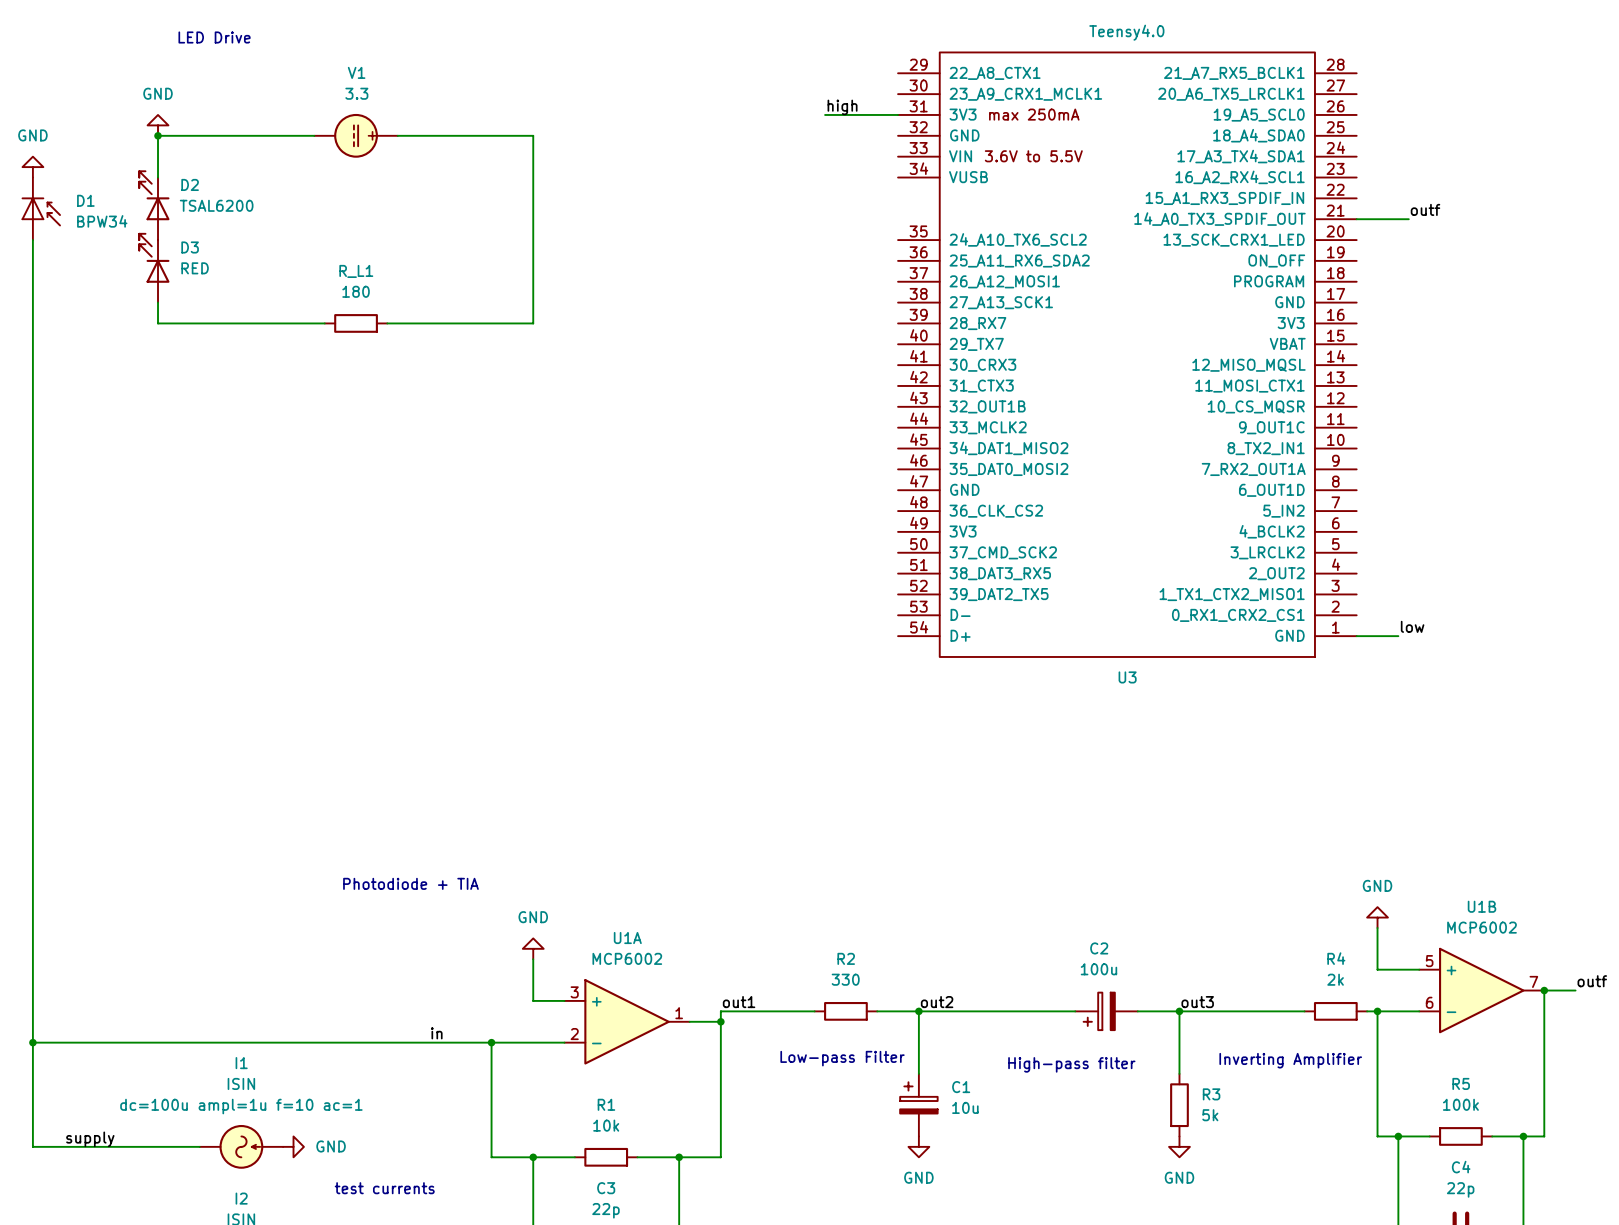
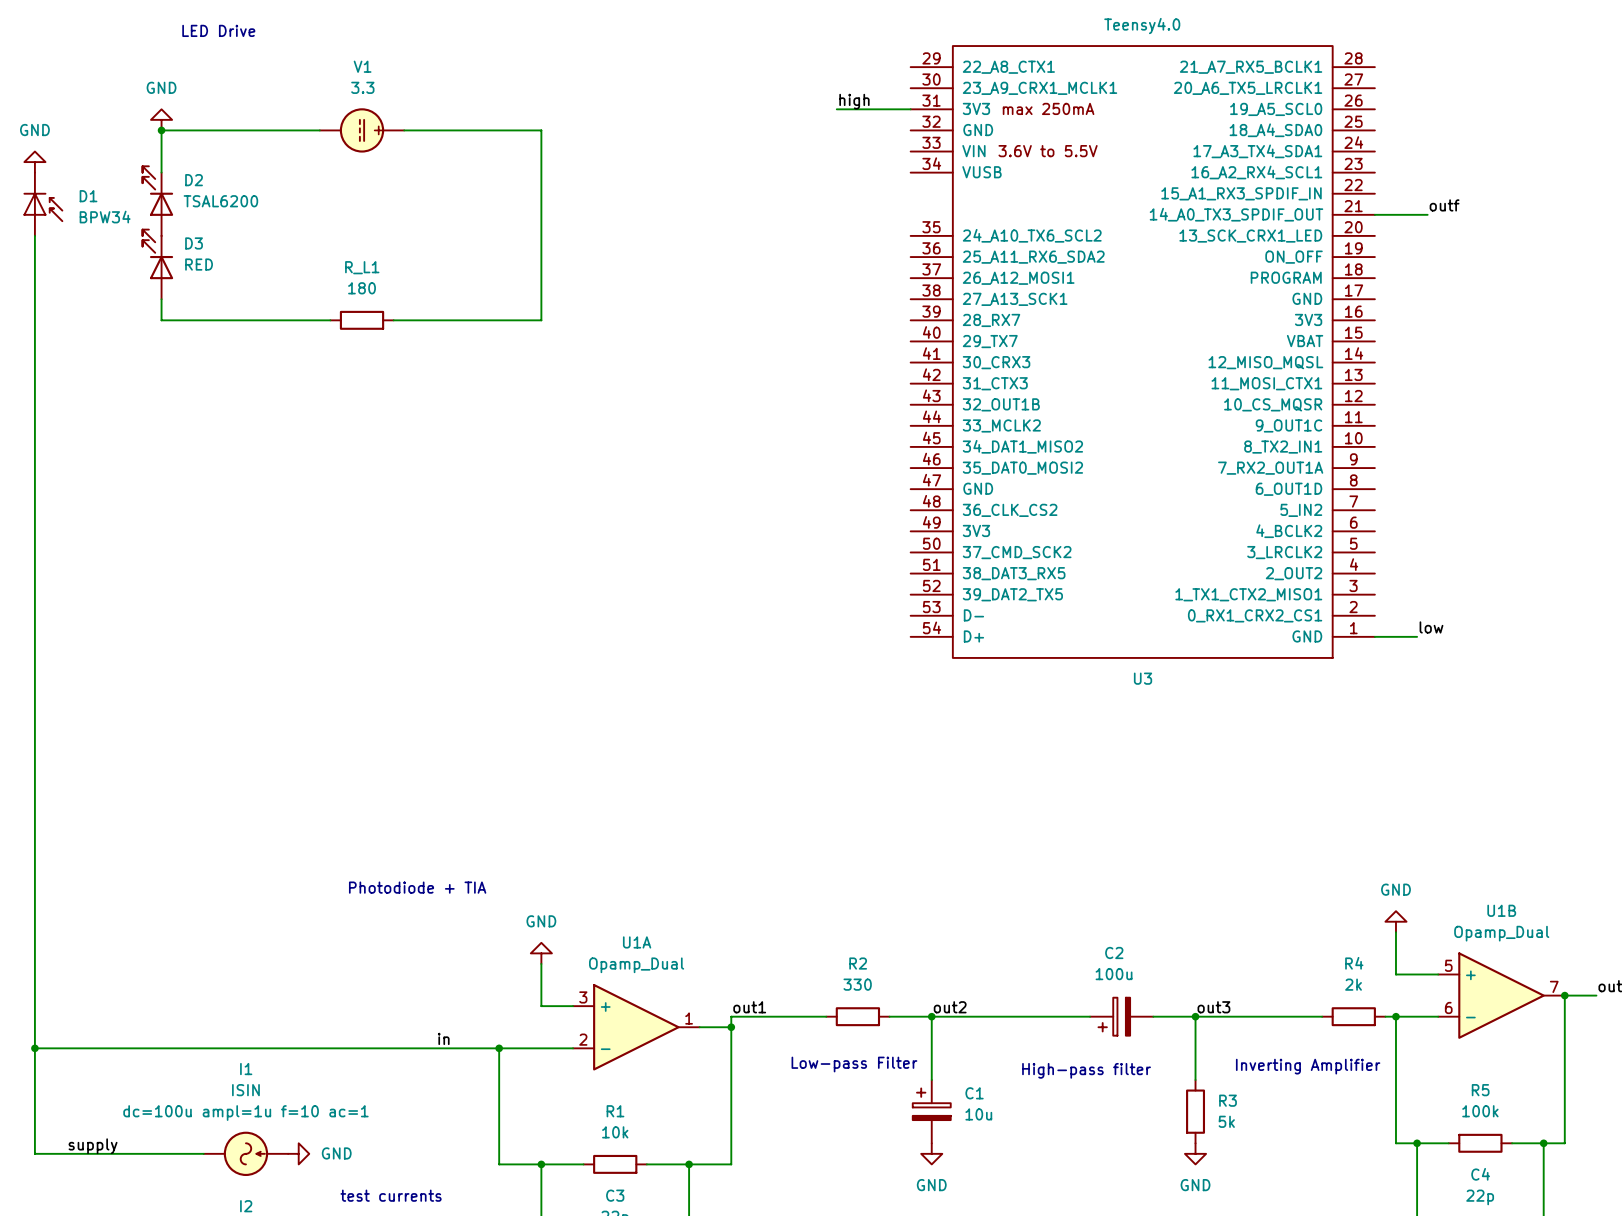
U1B value: MCP6002 (1482, 927) -> Opamp_Dual (1501, 933)
U1A value: MCP6002 (627, 958) -> Opamp_Dual (636, 965)

